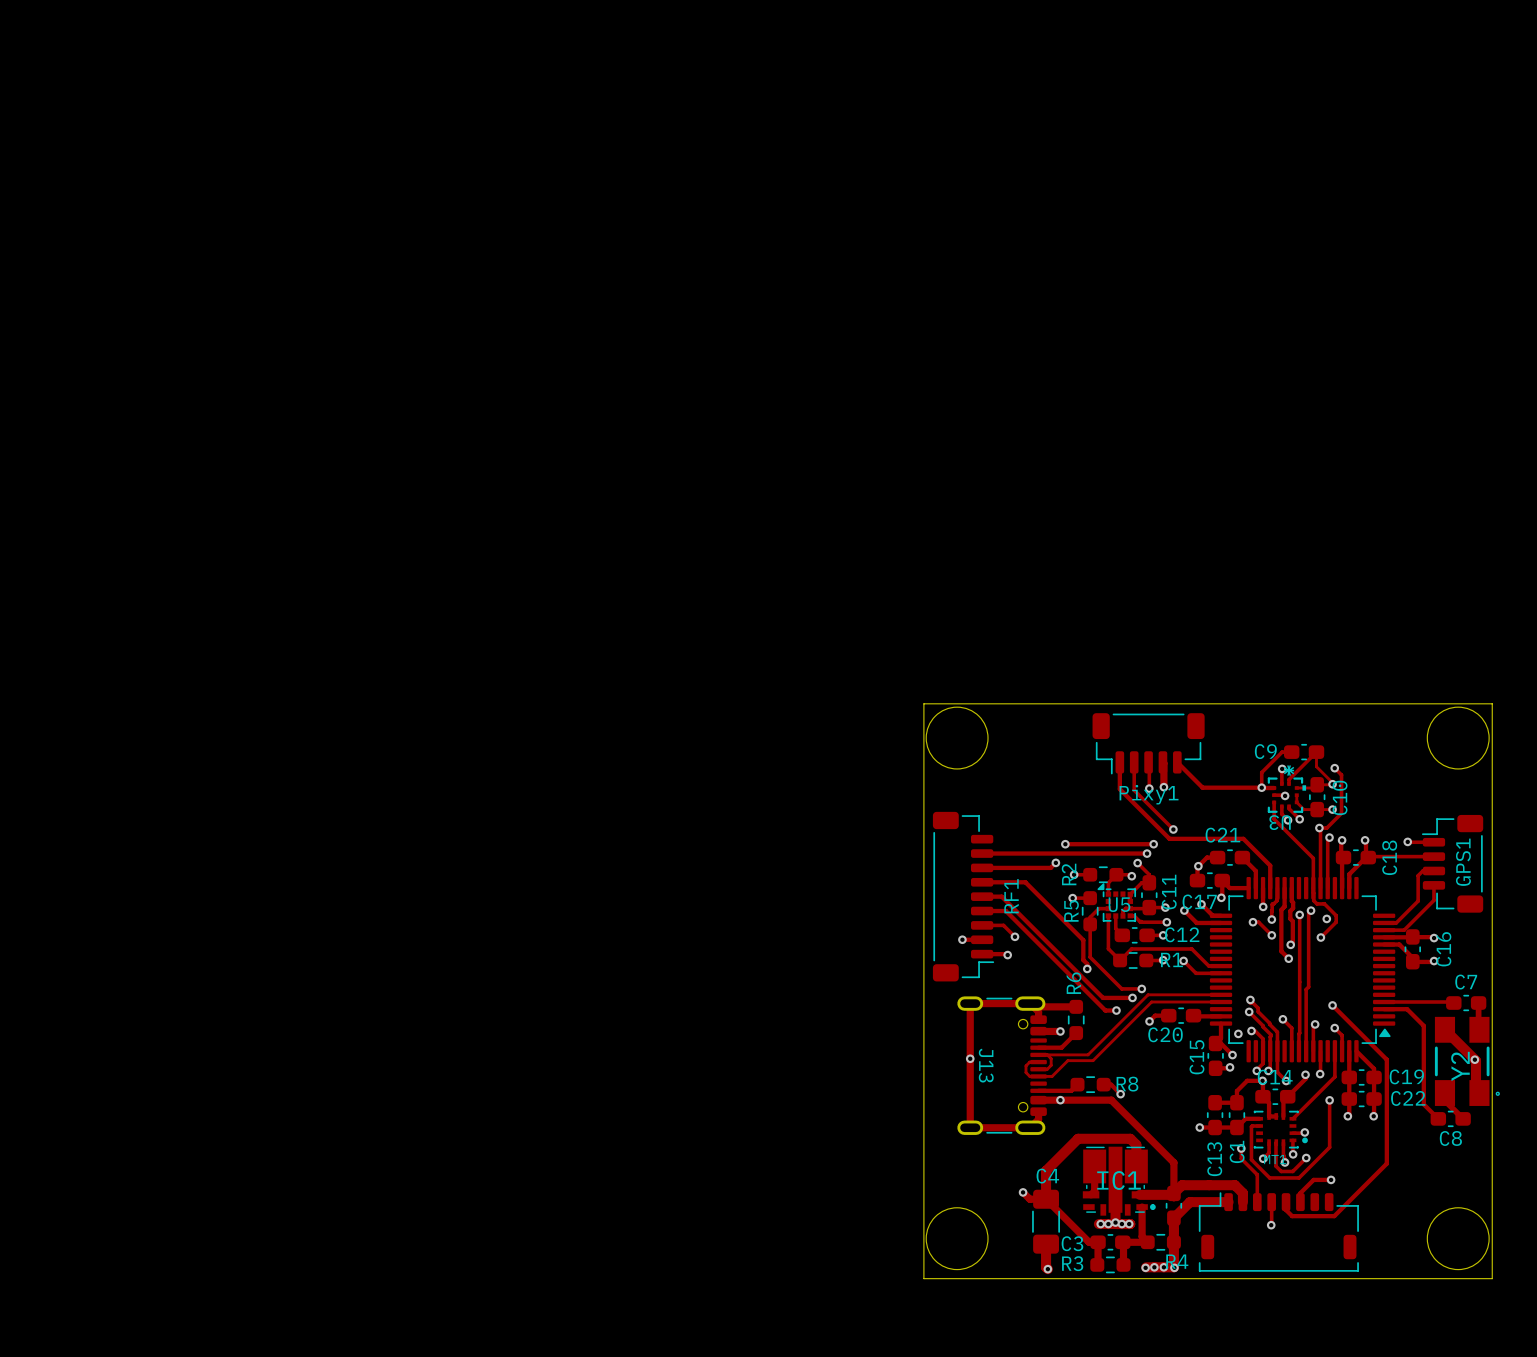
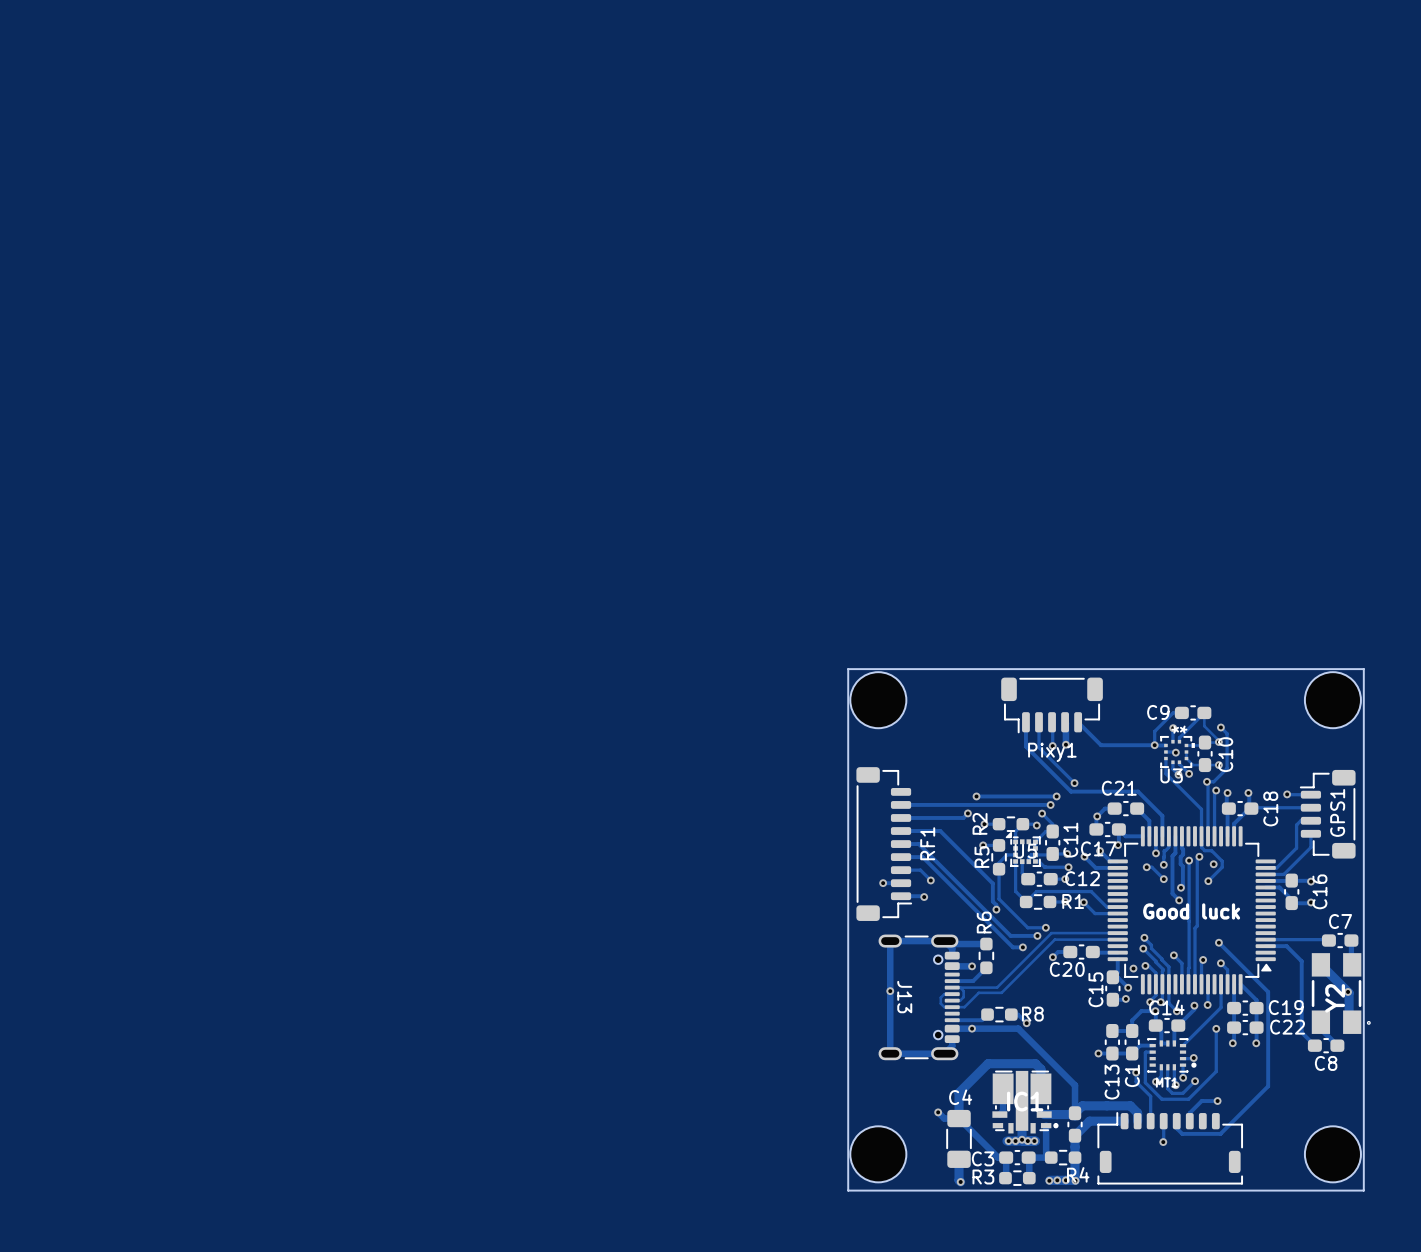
U3 name rotation: 0° (1280, 822) -> 180° (1171, 775)
text: none -> Good luck (1191, 911)

